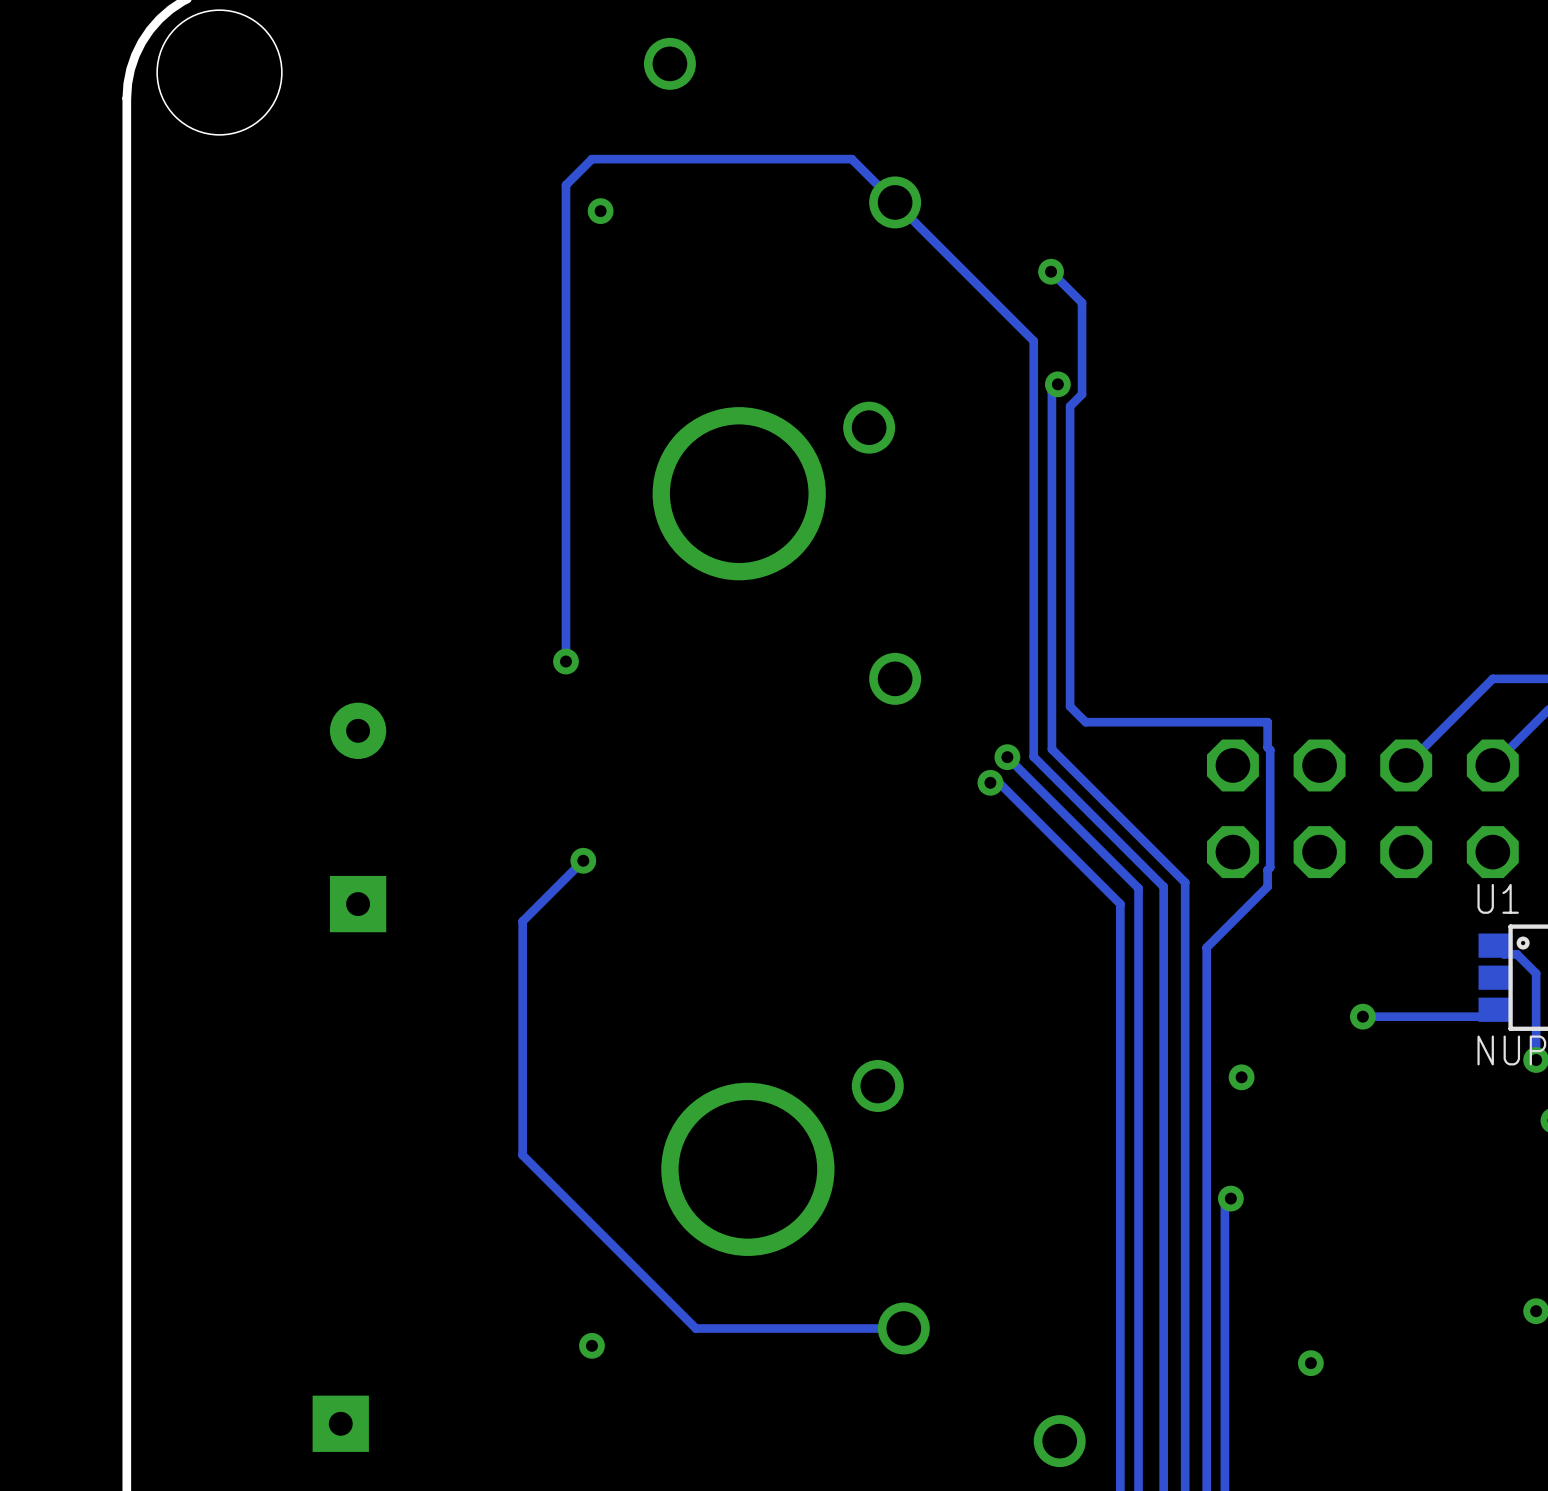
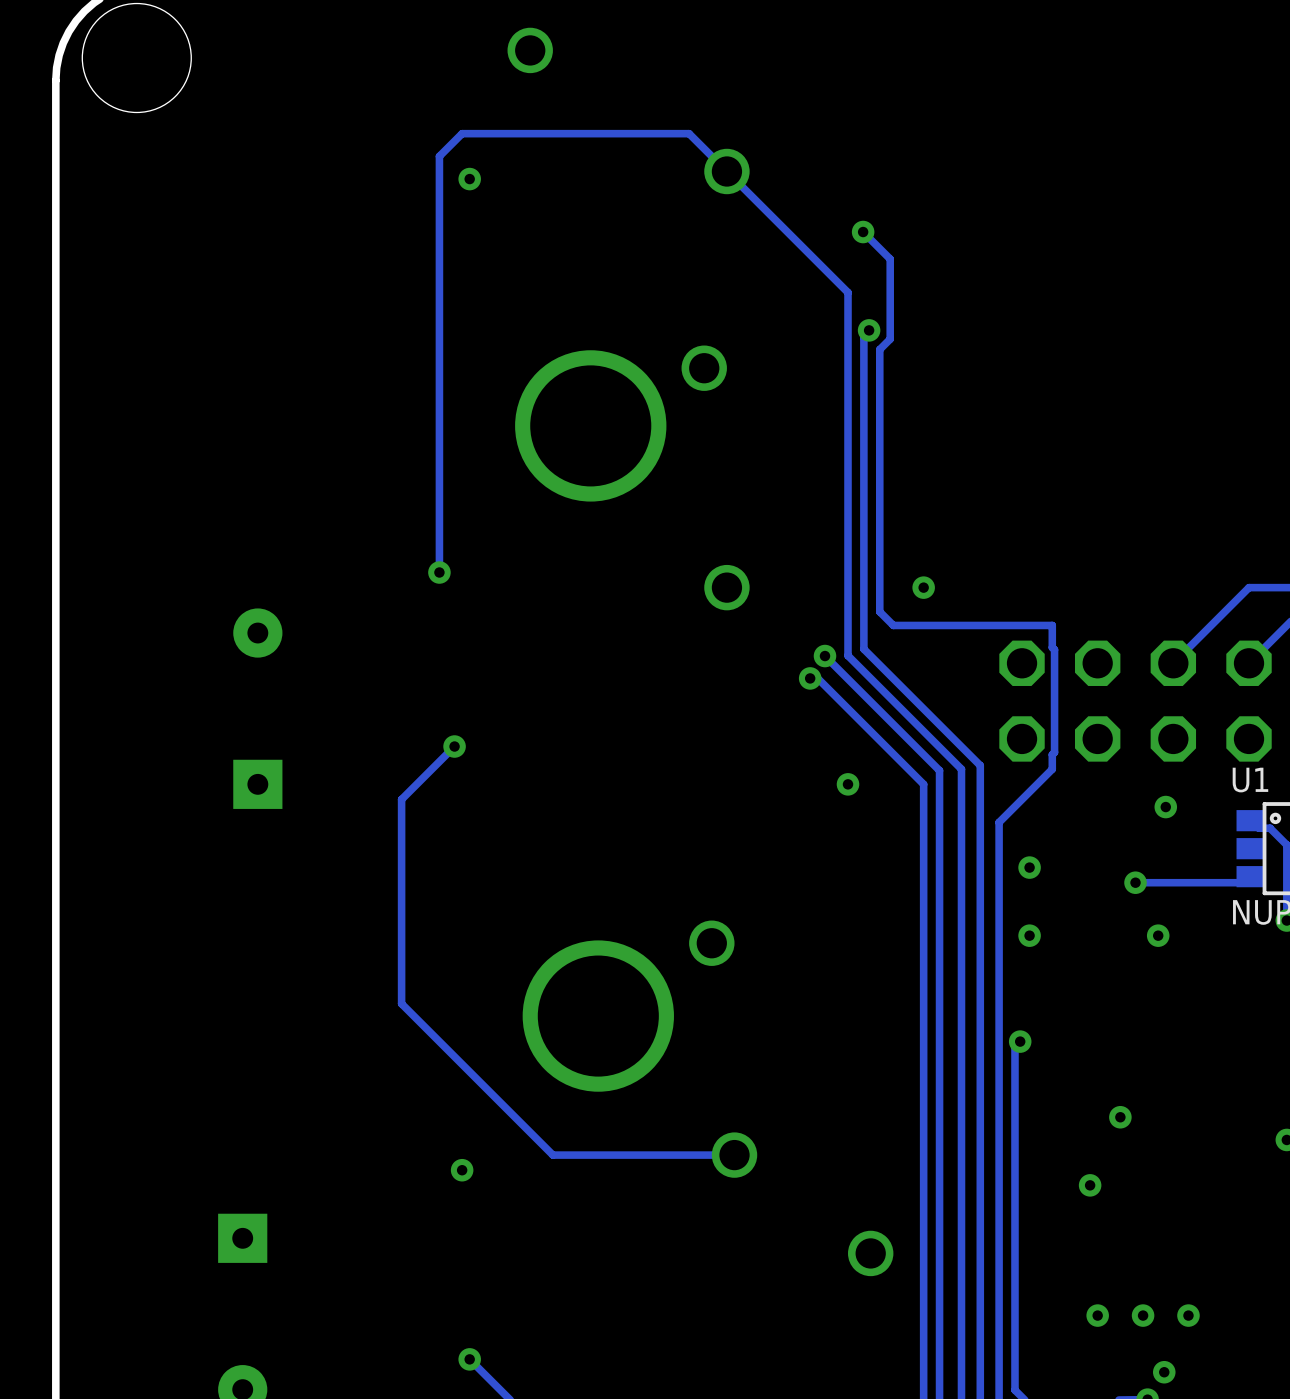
via: none -> (923, 587)
via: none -> (848, 784)
via: none -> (1165, 807)
via: none -> (1029, 867)
via: none -> (1158, 935)
via: none -> (1120, 1117)

